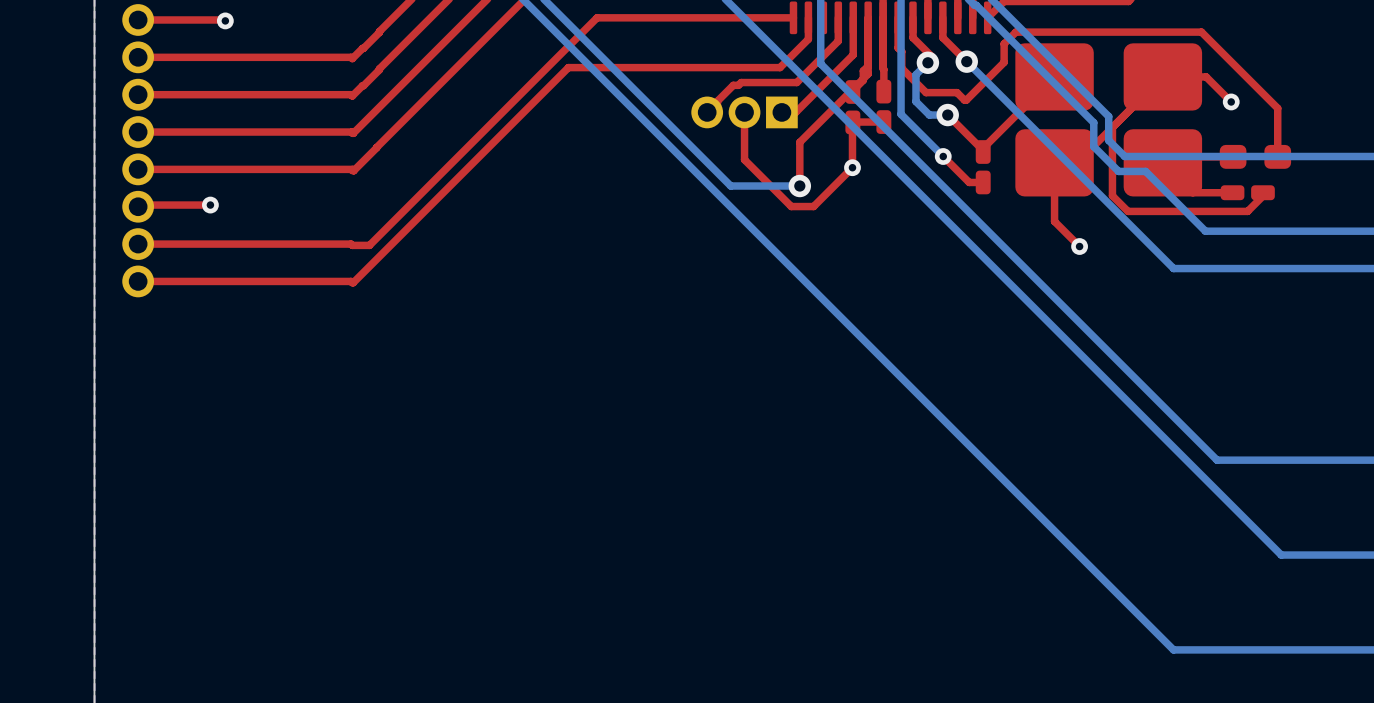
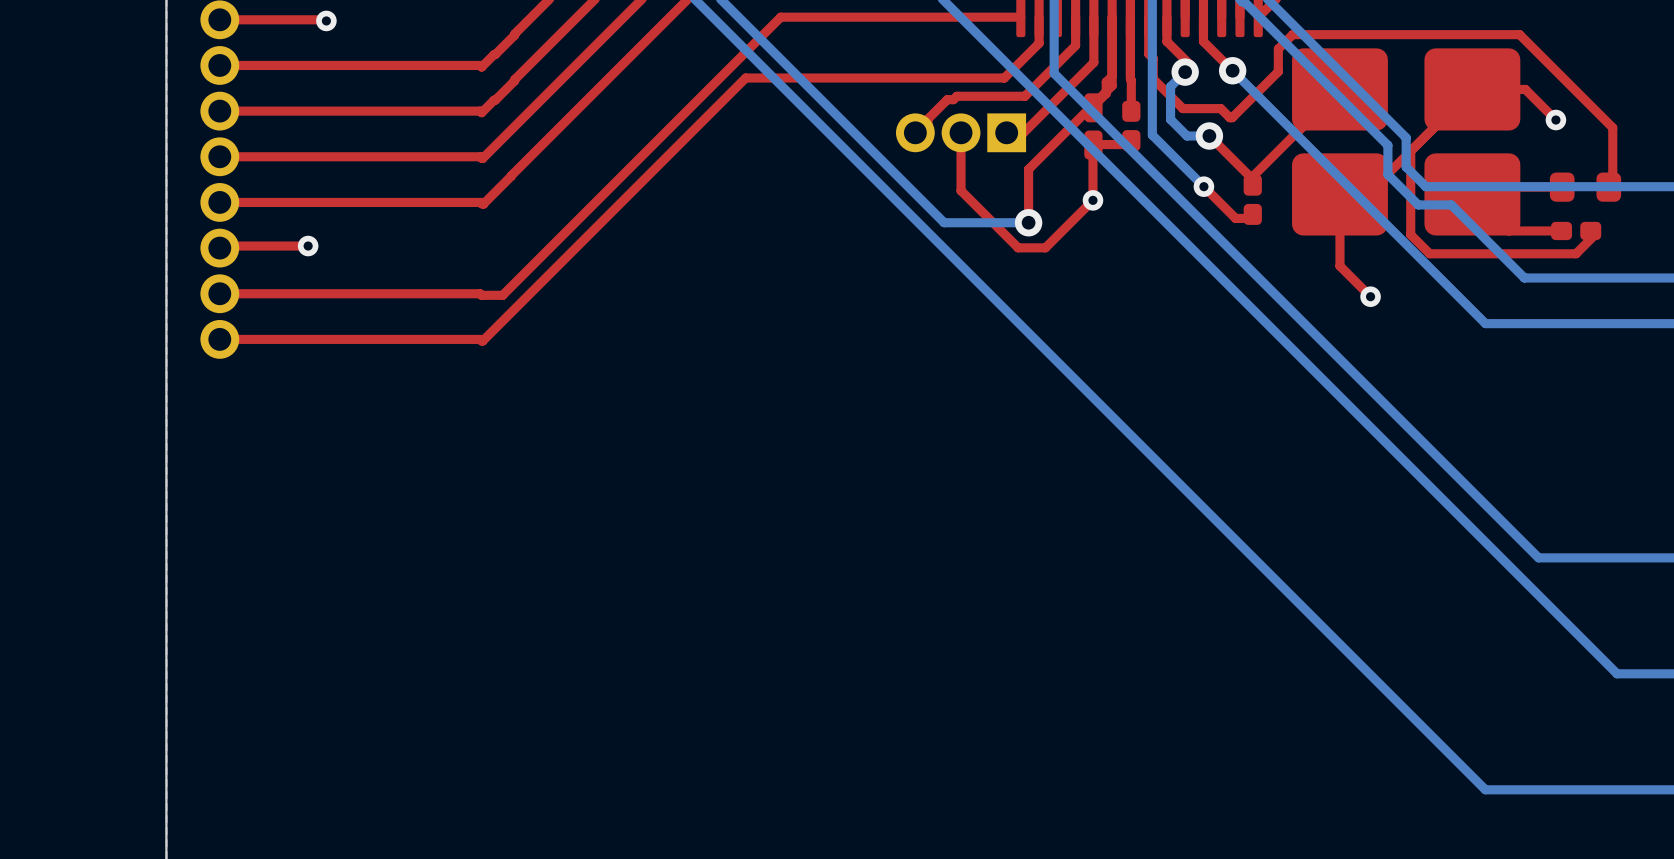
part footprint: [876, 79, 892, 134] -> [1122, 100, 1141, 152]
part footprint: [975, 140, 991, 195] -> [1243, 174, 1262, 225]
part footprint: [1219, 144, 1292, 169] -> [1549, 172, 1622, 202]
part footprint: [1220, 185, 1275, 201] -> [1551, 221, 1602, 241]

